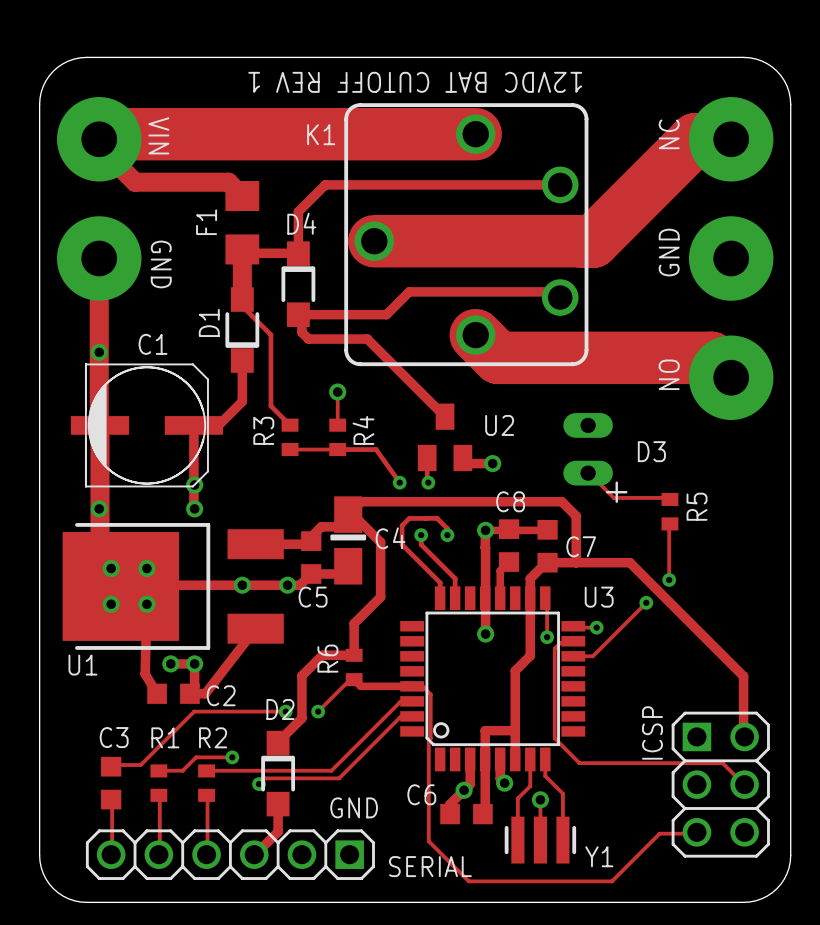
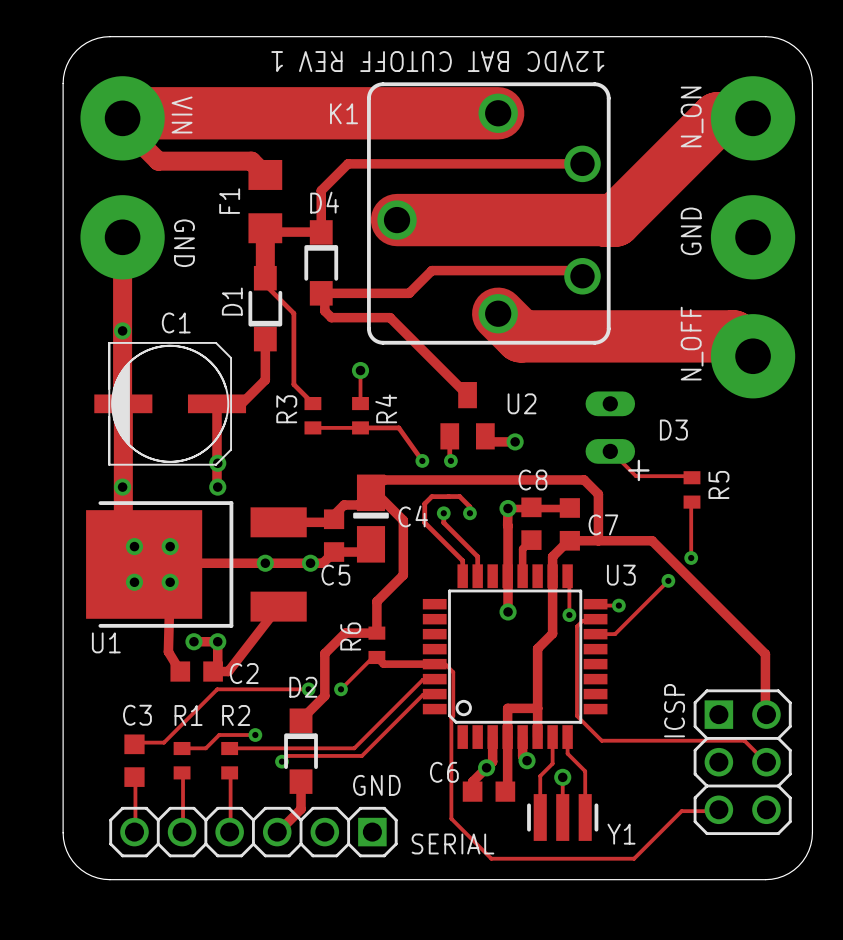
text: NC (669, 134) -> none
text: none -> N_ON (692, 116)
text: NO (669, 374) -> N_OFF (692, 343)

